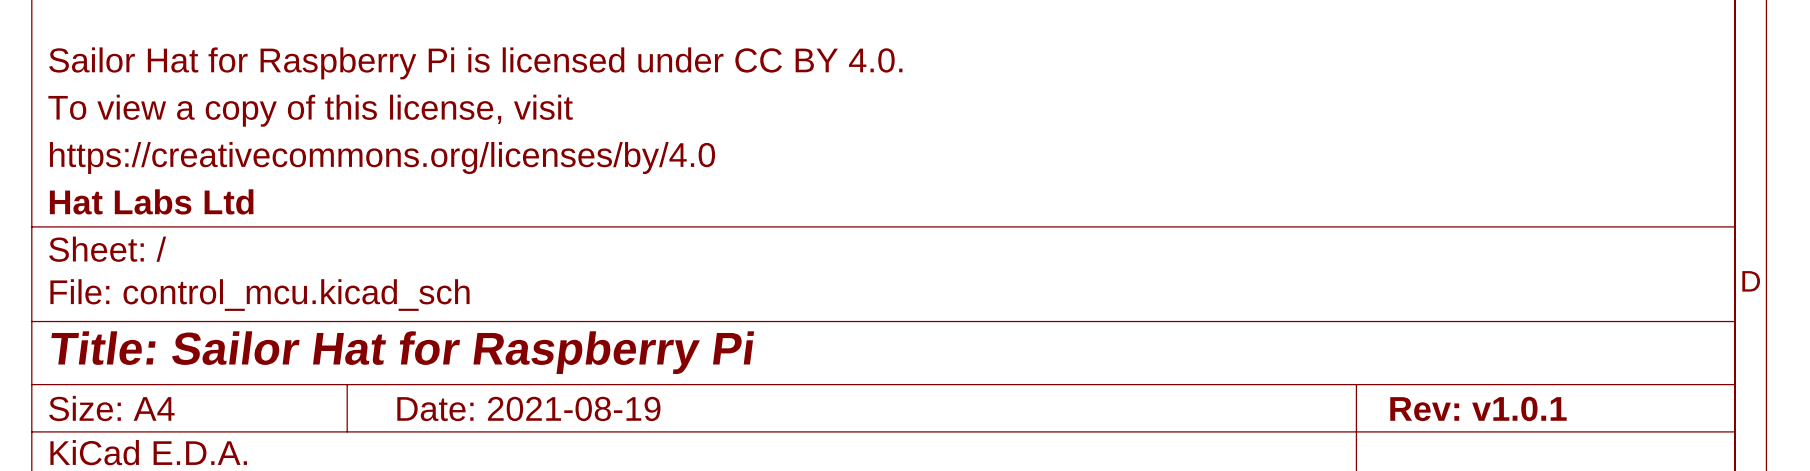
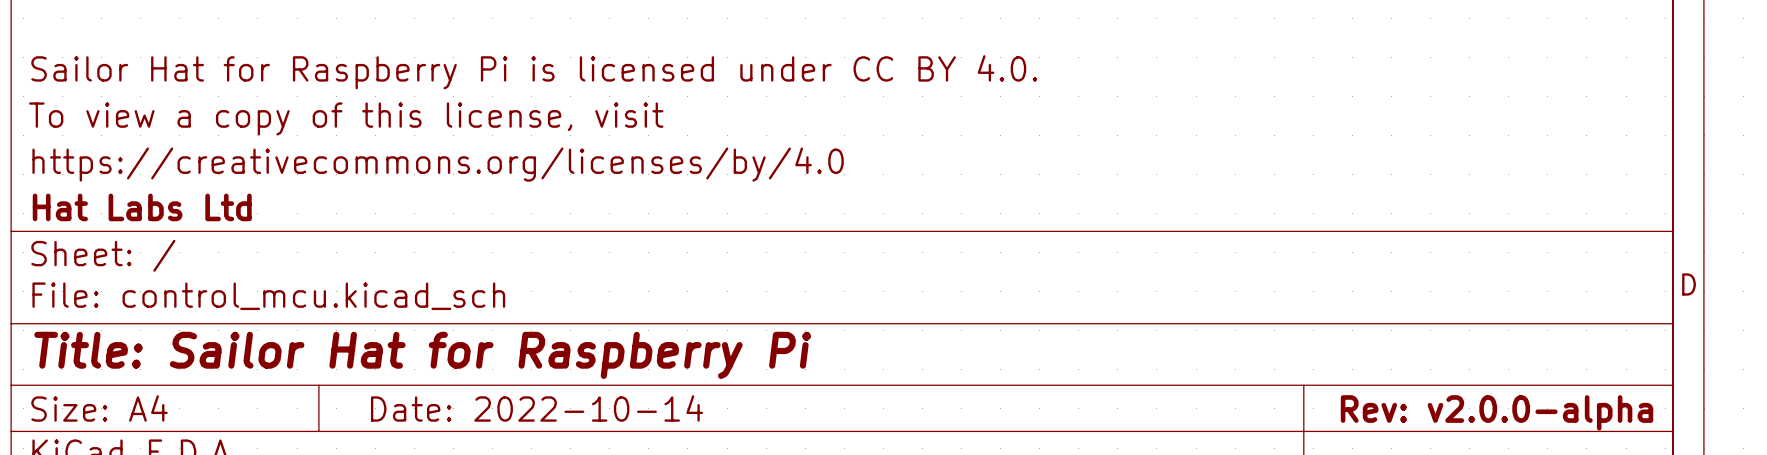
title block: Date: 2021-08-19 (528, 408) -> Date: 2022-10-14 (537, 408)
title block: Rev: v1.0.1 (1478, 408) -> Rev: v2.0.0-alpha (1497, 412)

